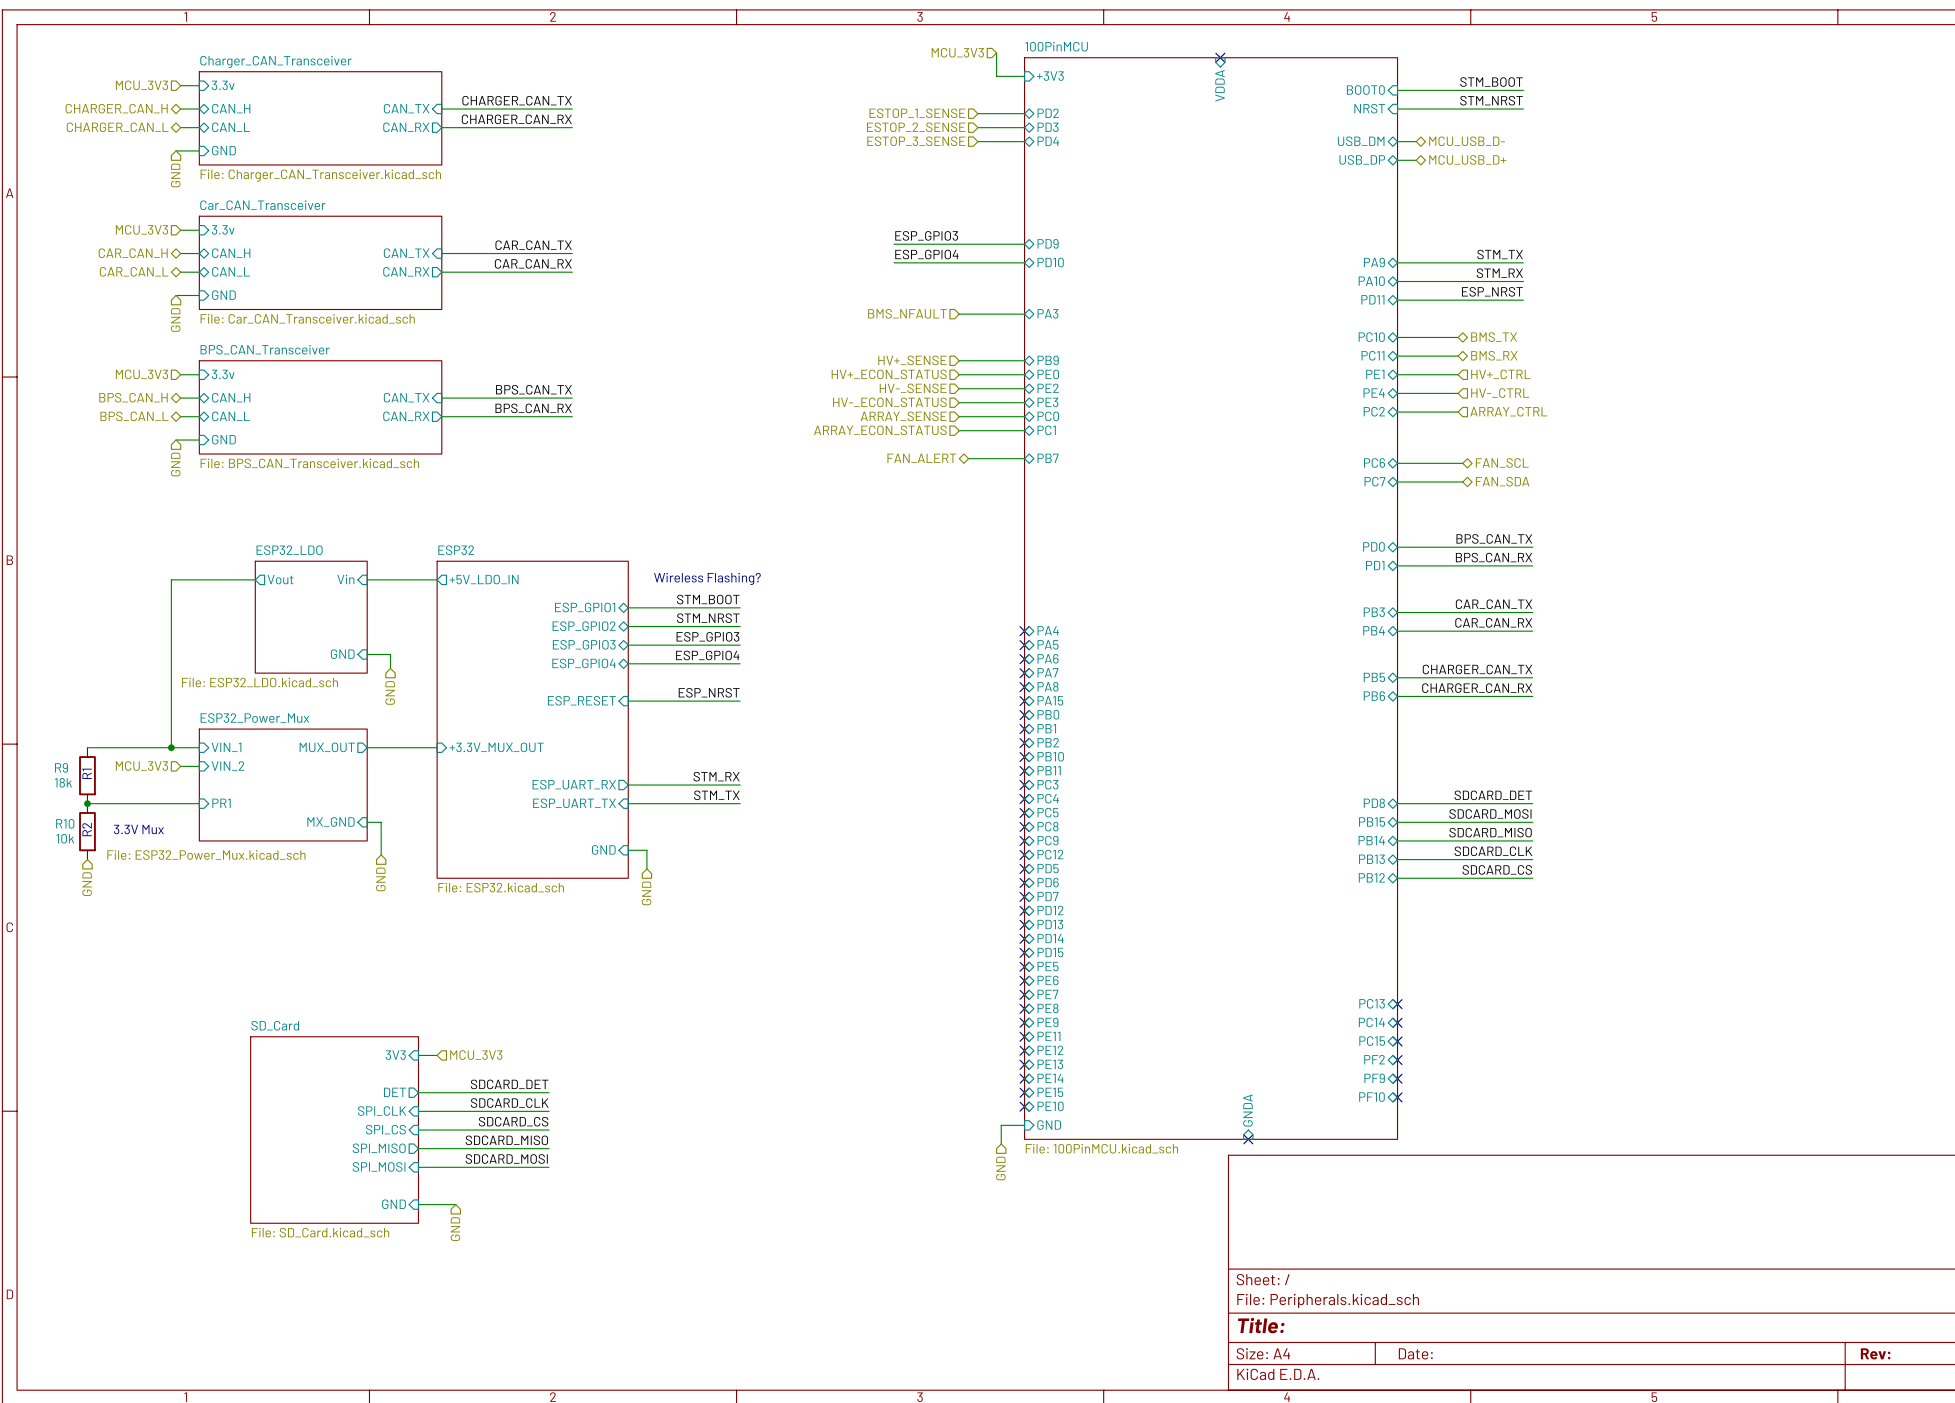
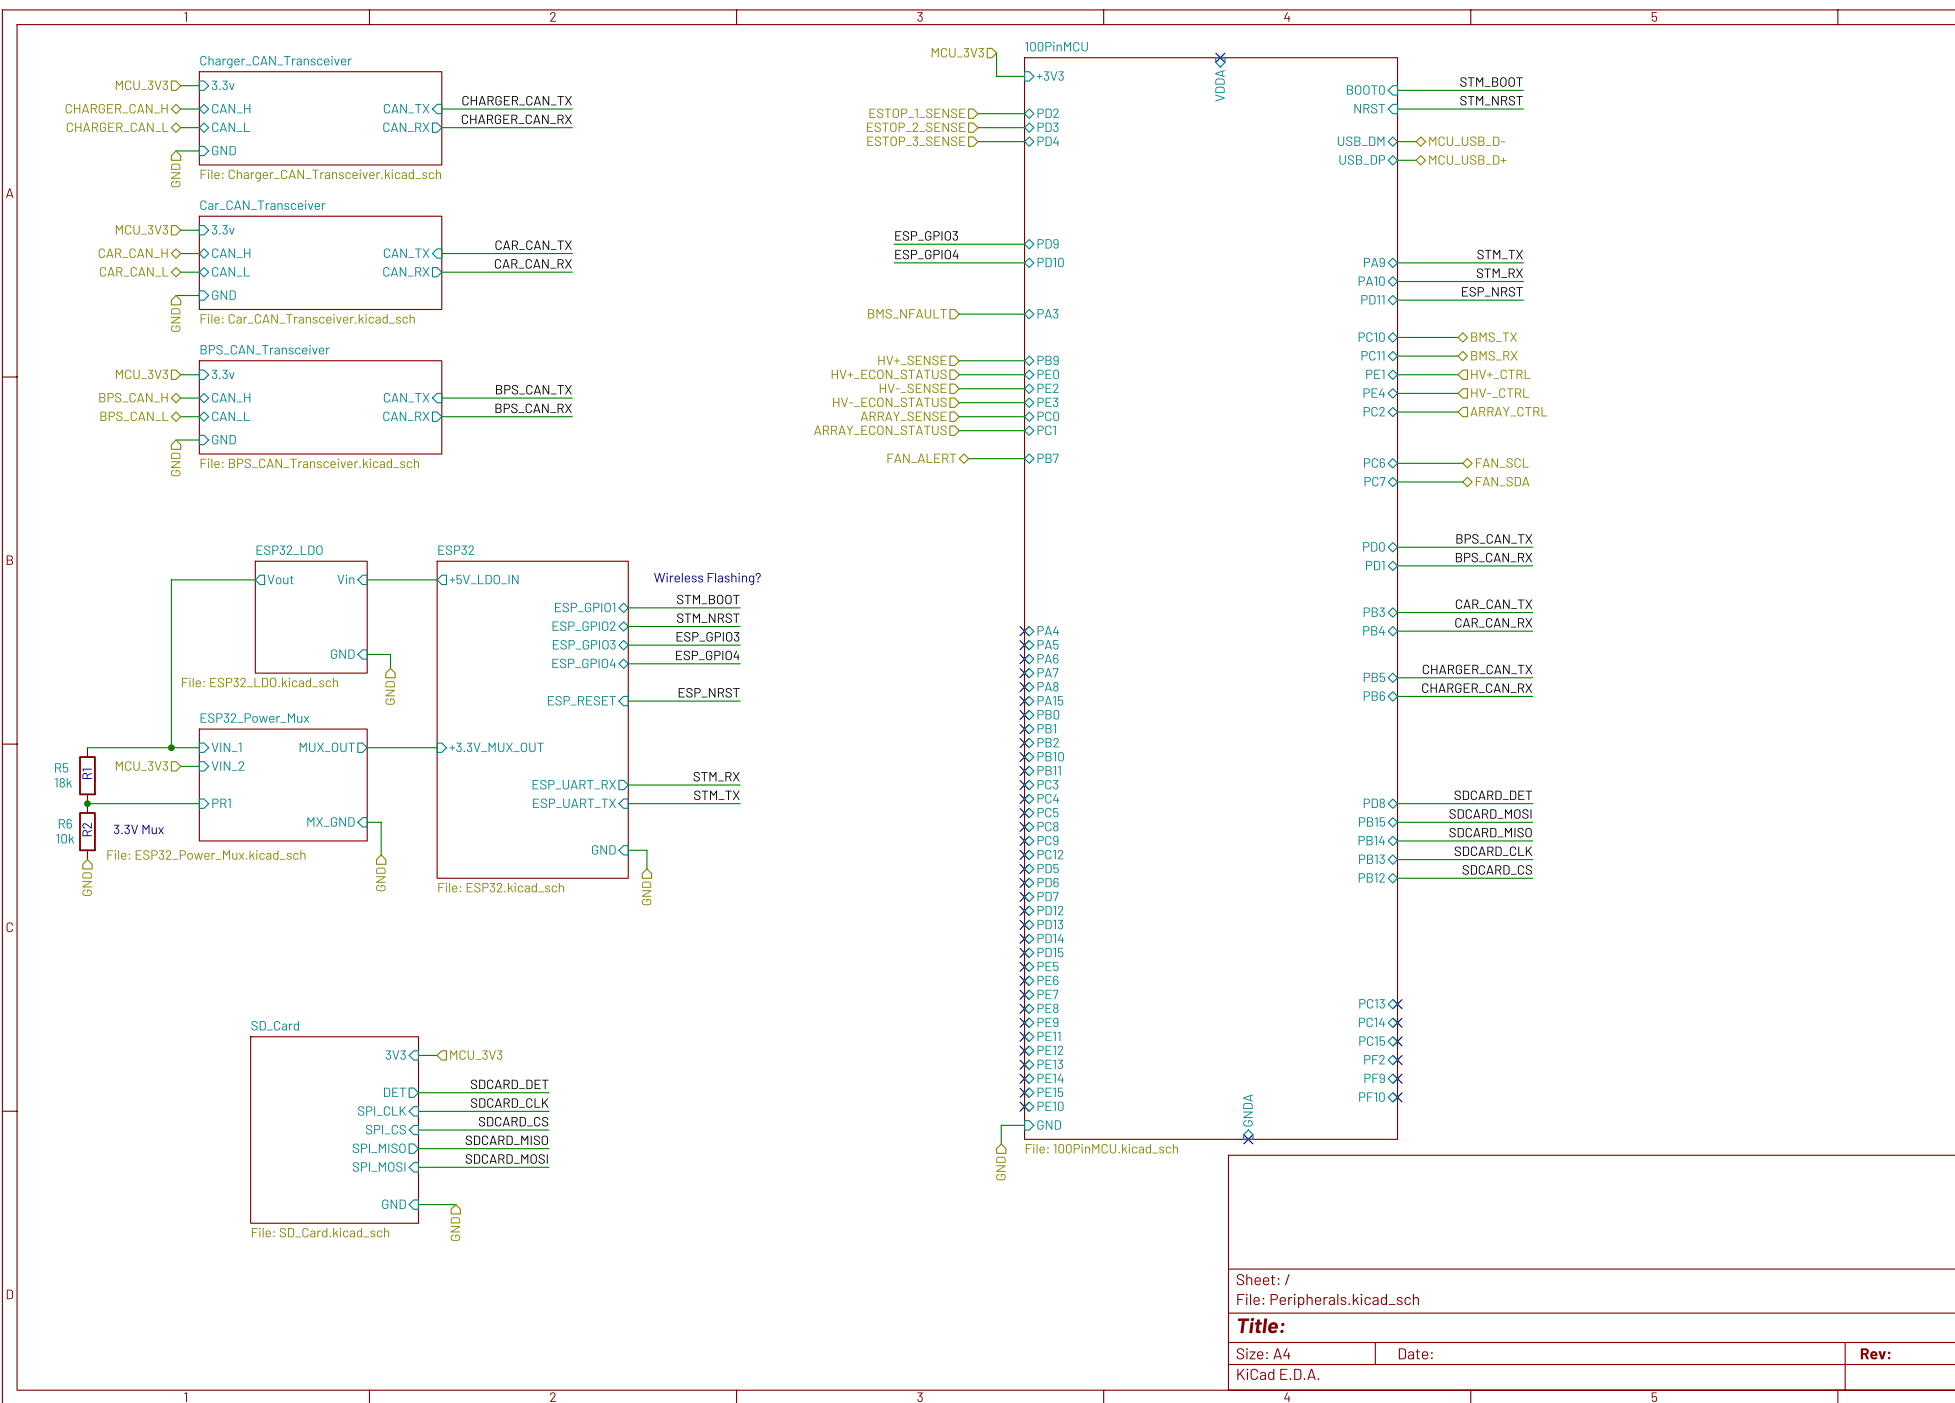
R9 name: R9 (61, 767) -> R5 (61, 767)
R10 name: R10 (65, 823) -> R6 (65, 823)

